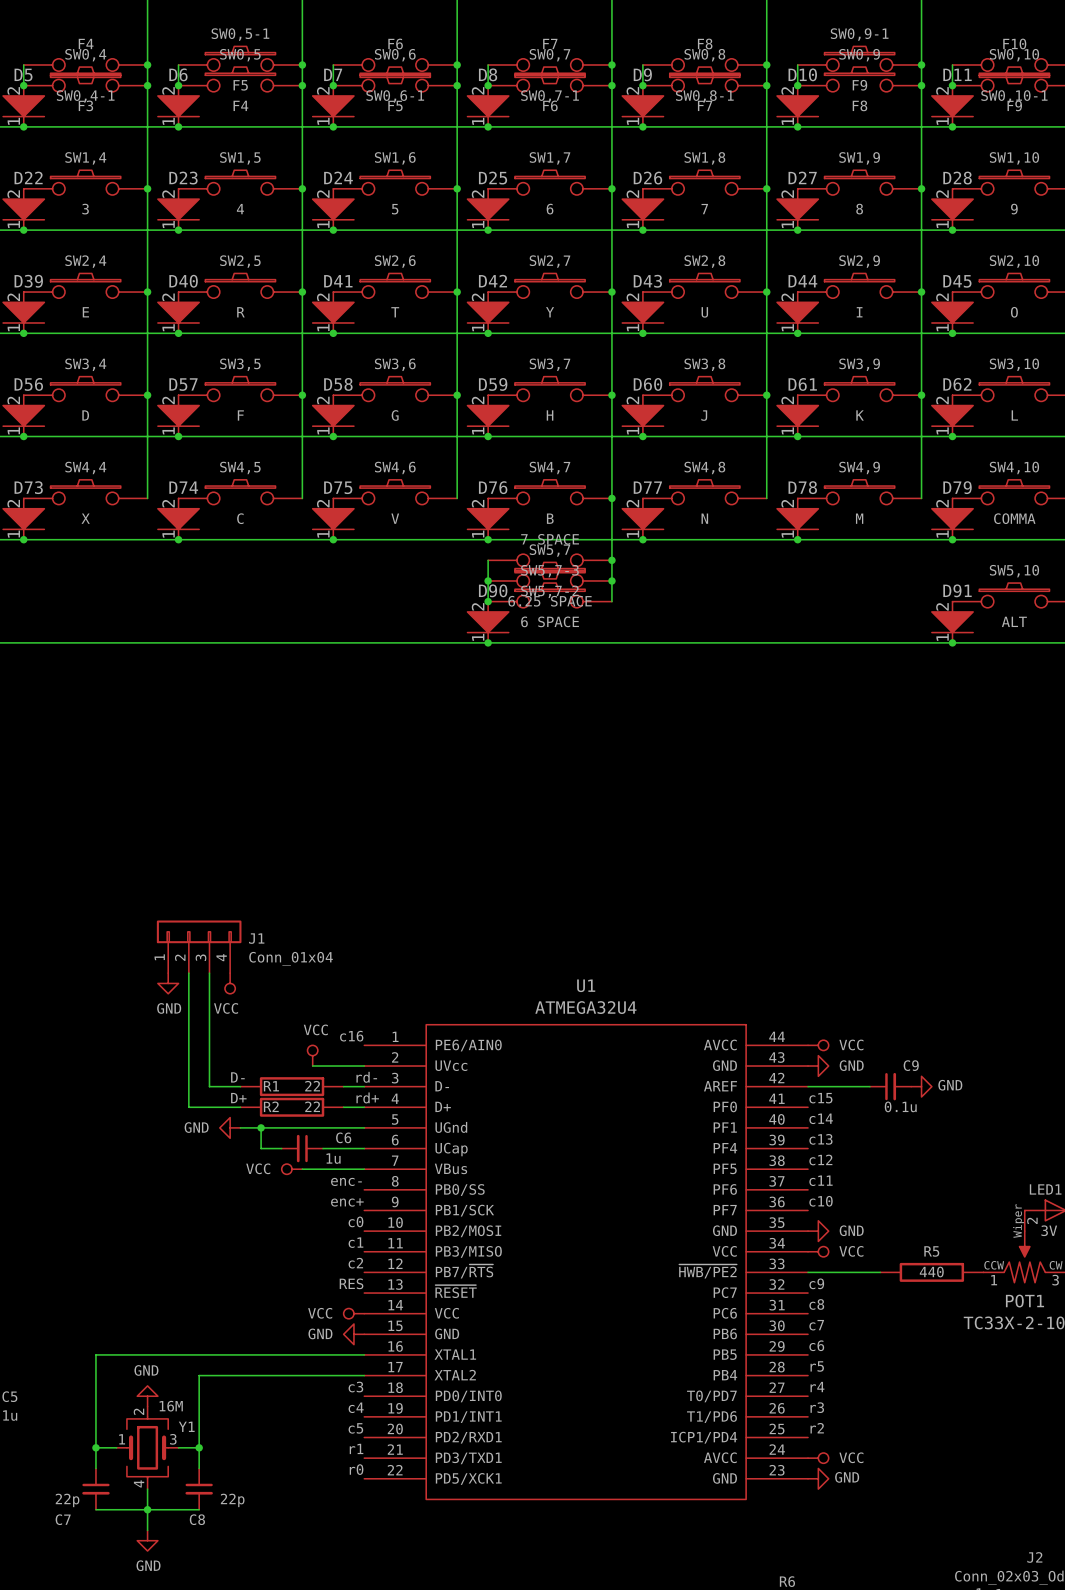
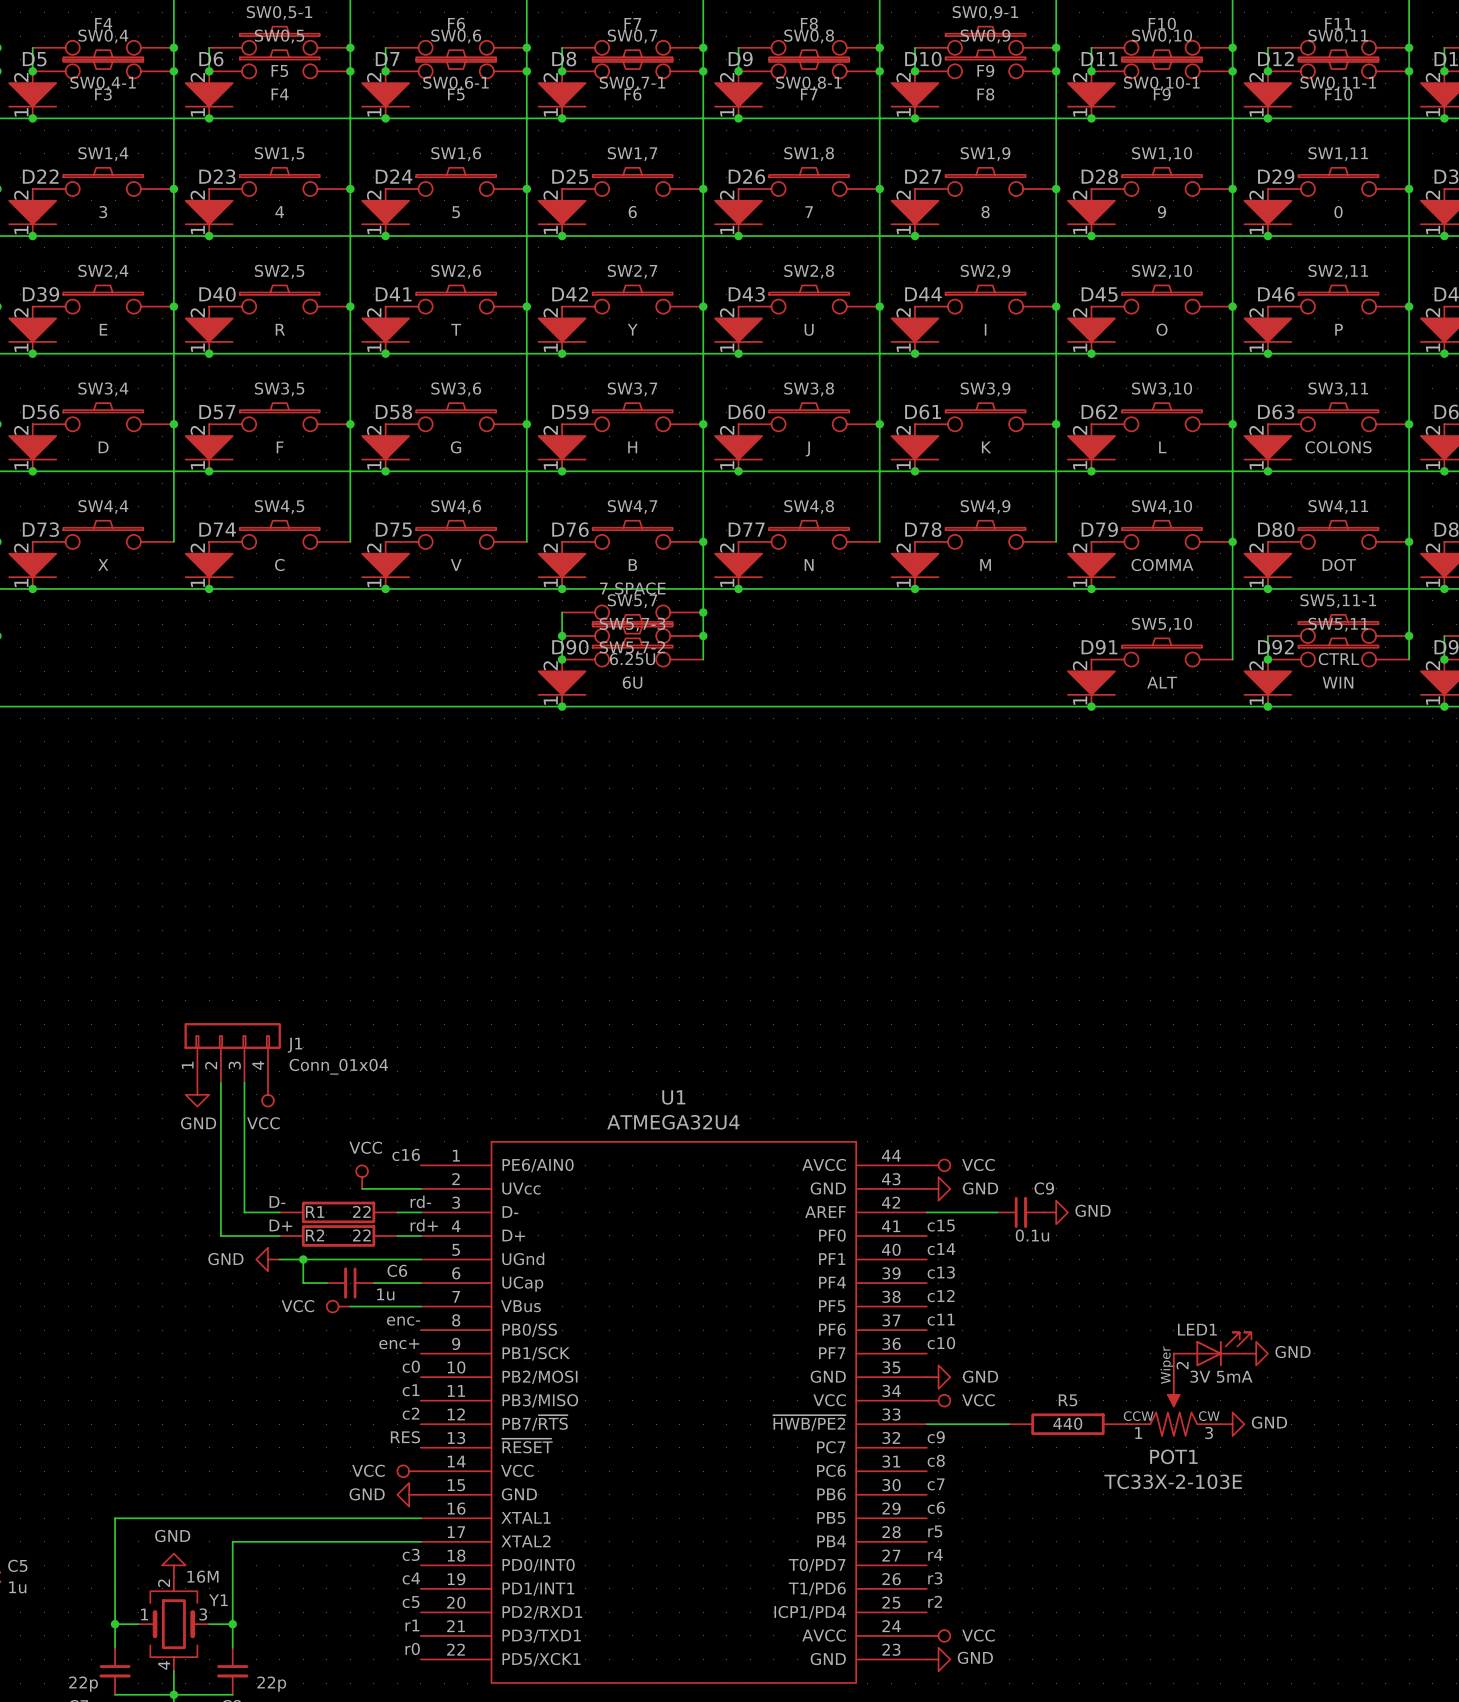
SW5,7 value: 6.25 SPACE (550, 601) -> 6.25U (632, 659)
SW5,7-3 value: 6 SPACE (550, 621) -> 6U (632, 682)

